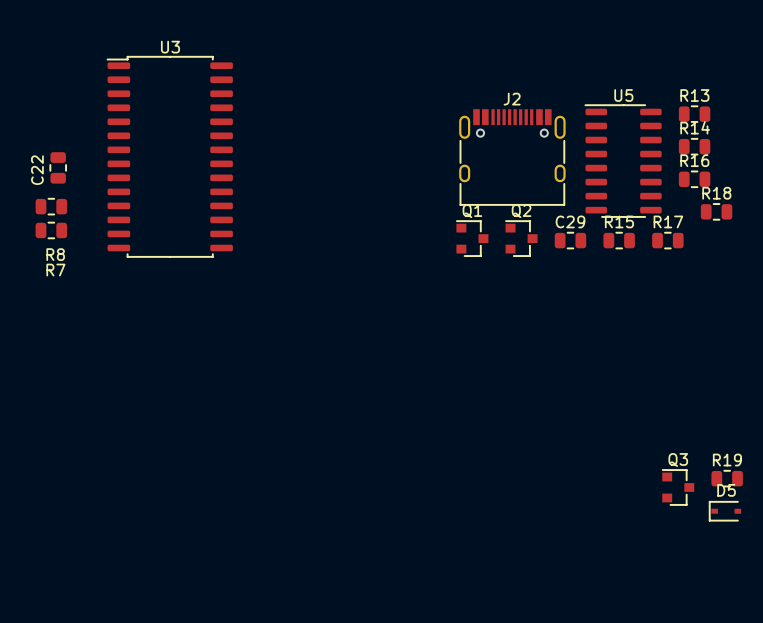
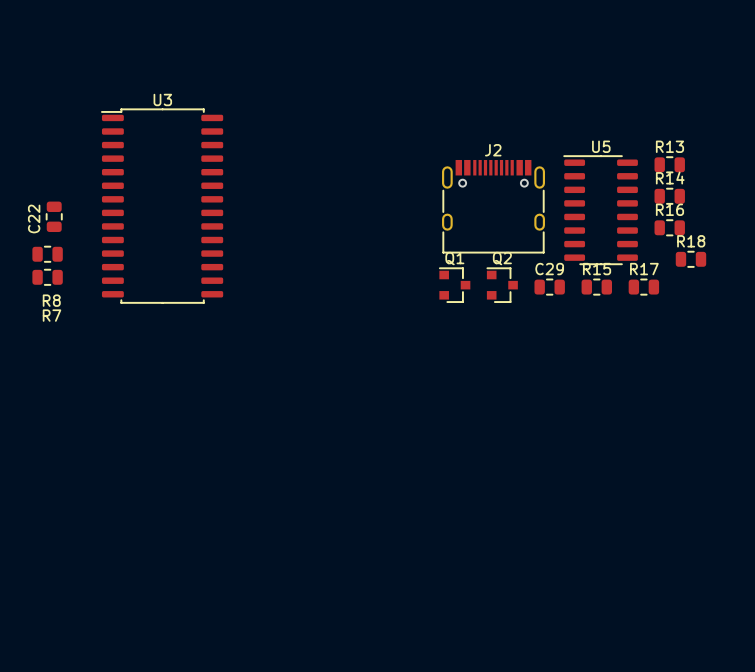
R19: (727, 478) -> none
Q3: (678, 487) -> none
D5: (725, 511) -> none

